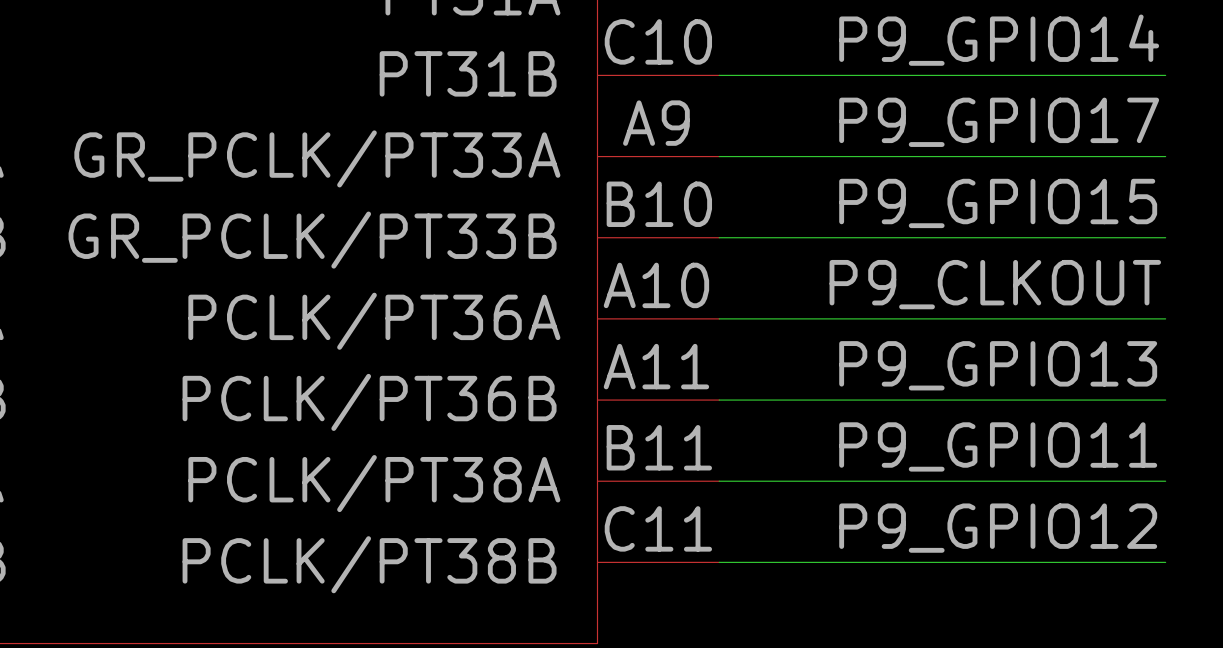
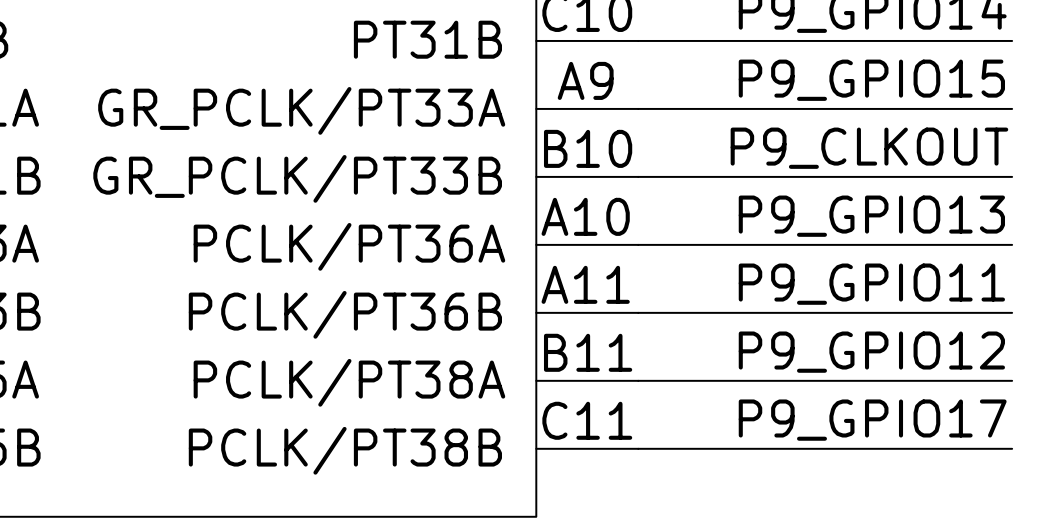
label: P9_GPIO17 (999, 122) -> P9_GPIO15 (871, 80)
label: P9_GPIO15 (998, 203) -> P9_CLKOUT (869, 148)
label: P9_CLKOUT (995, 284) -> P9_GPIO13 (871, 216)
label: P9_GPIO13 (998, 365) -> P9_GPIO11 (871, 284)
label: P9_GPIO11 (998, 446) -> P9_GPIO12 (871, 352)
label: P9_GPIO12 (998, 528) -> P9_GPIO17 (872, 420)

